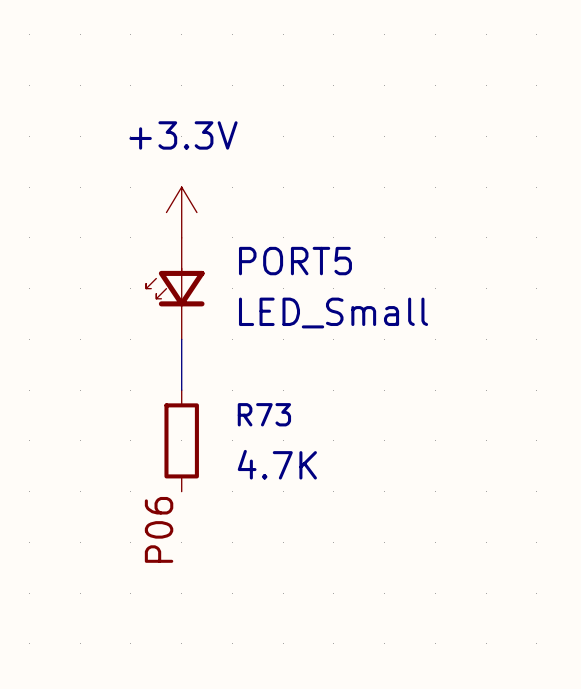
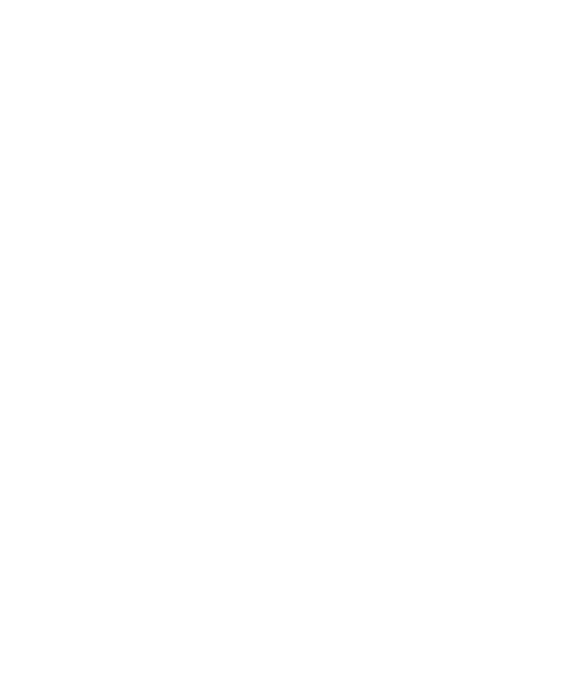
power symbol: +3.3V (181, 212) -> none
PORT5: LED_Small (175, 288) -> none
wire: (181, 339) (181, 390) -> none
R73: 4.7K (181, 440) -> none
label: P06 (159, 529) -> none

